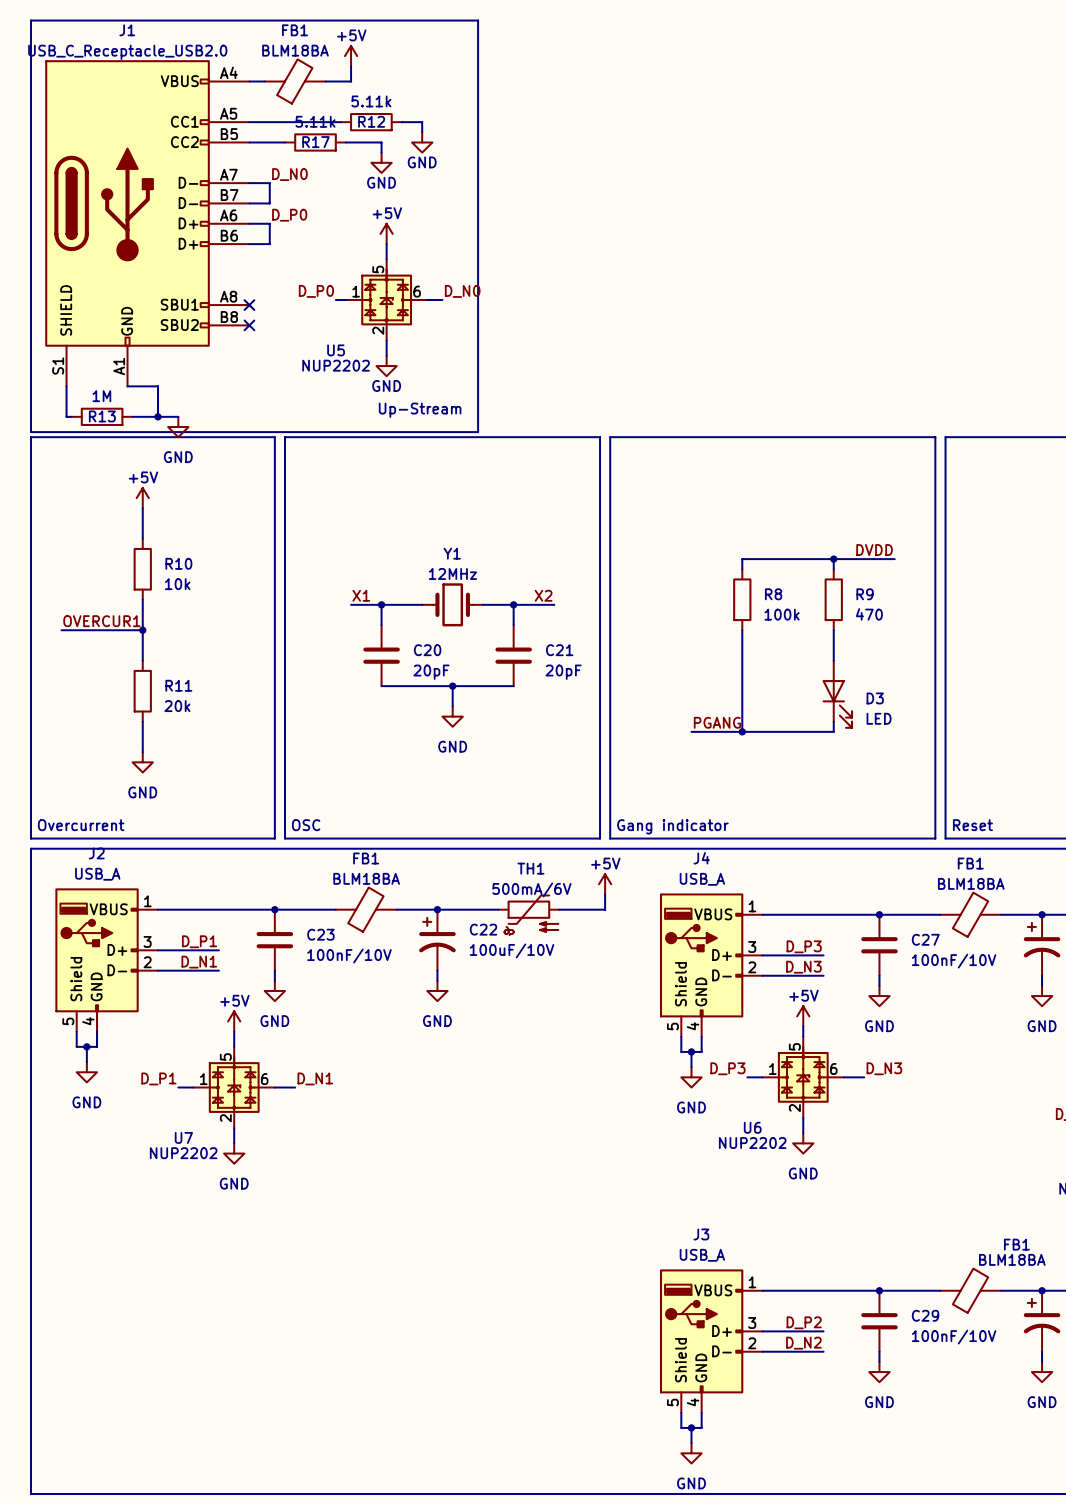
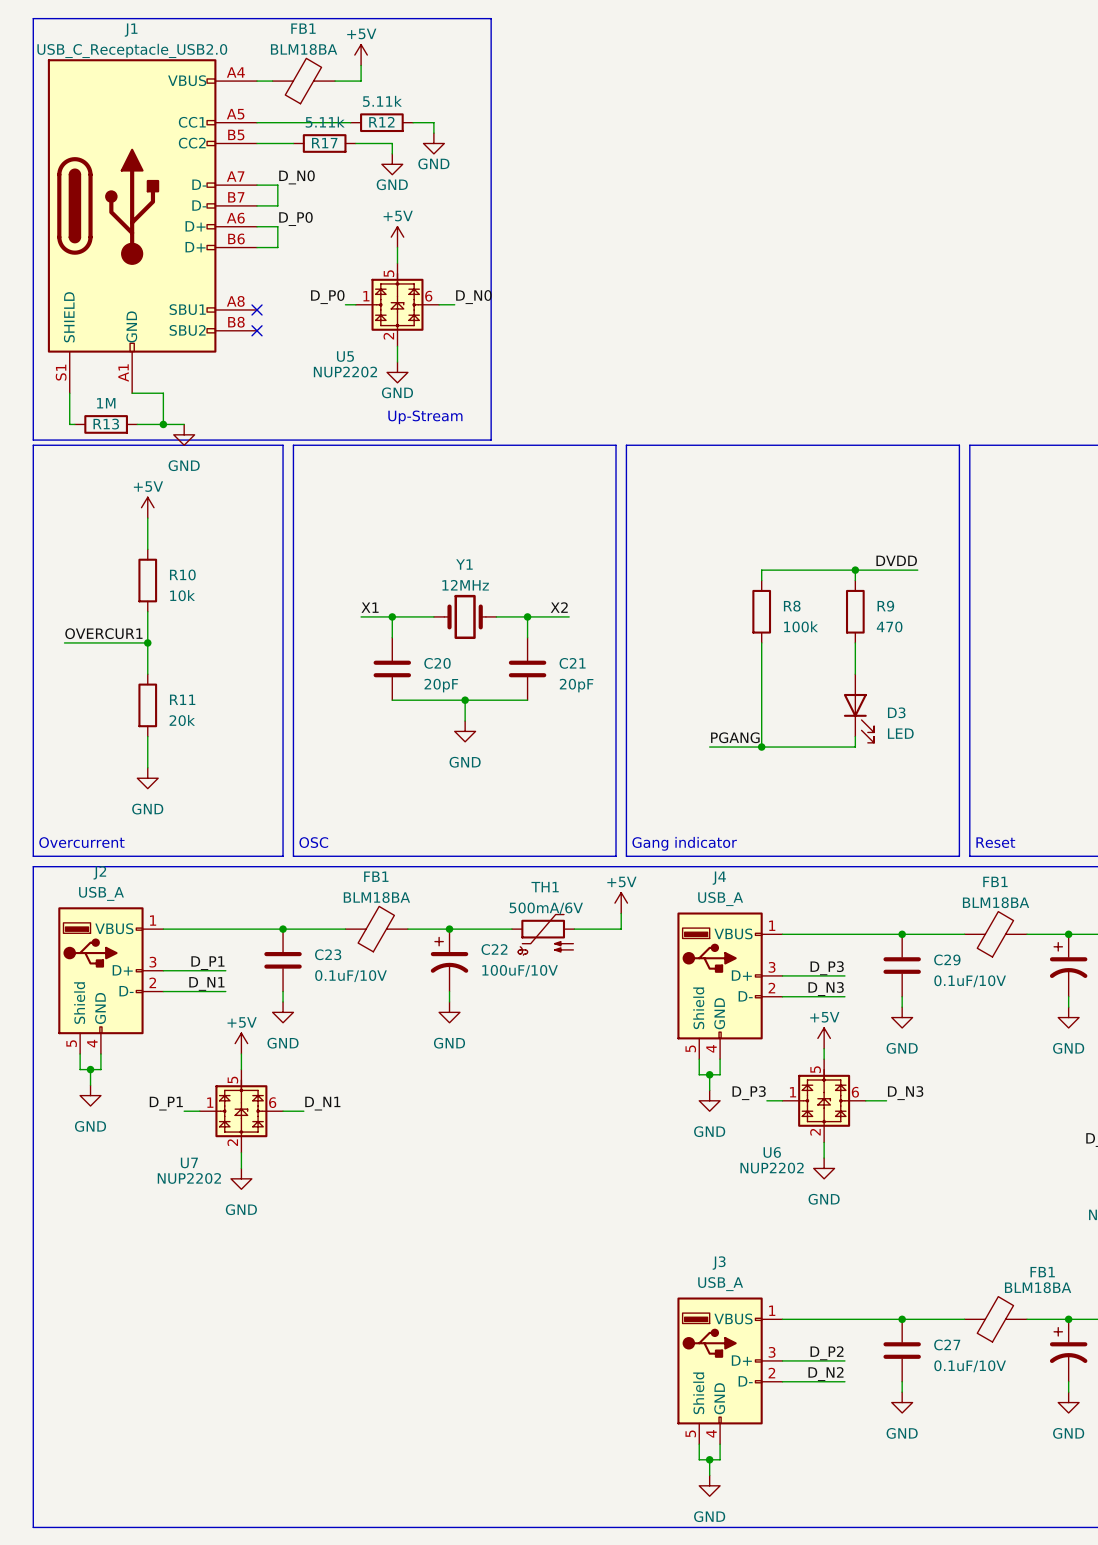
C27 name: C27 (925, 939) -> C29 (947, 959)
C23 value: 100nF/10V (349, 956) -> 0.1uF/10V (351, 976)
C27 value: 100nF/10V (954, 961) -> 0.1uF/10V (970, 981)
C29 name: C29 (925, 1315) -> C27 (947, 1344)
C29 value: 100nF/10V (954, 1337) -> 0.1uF/10V (970, 1366)

